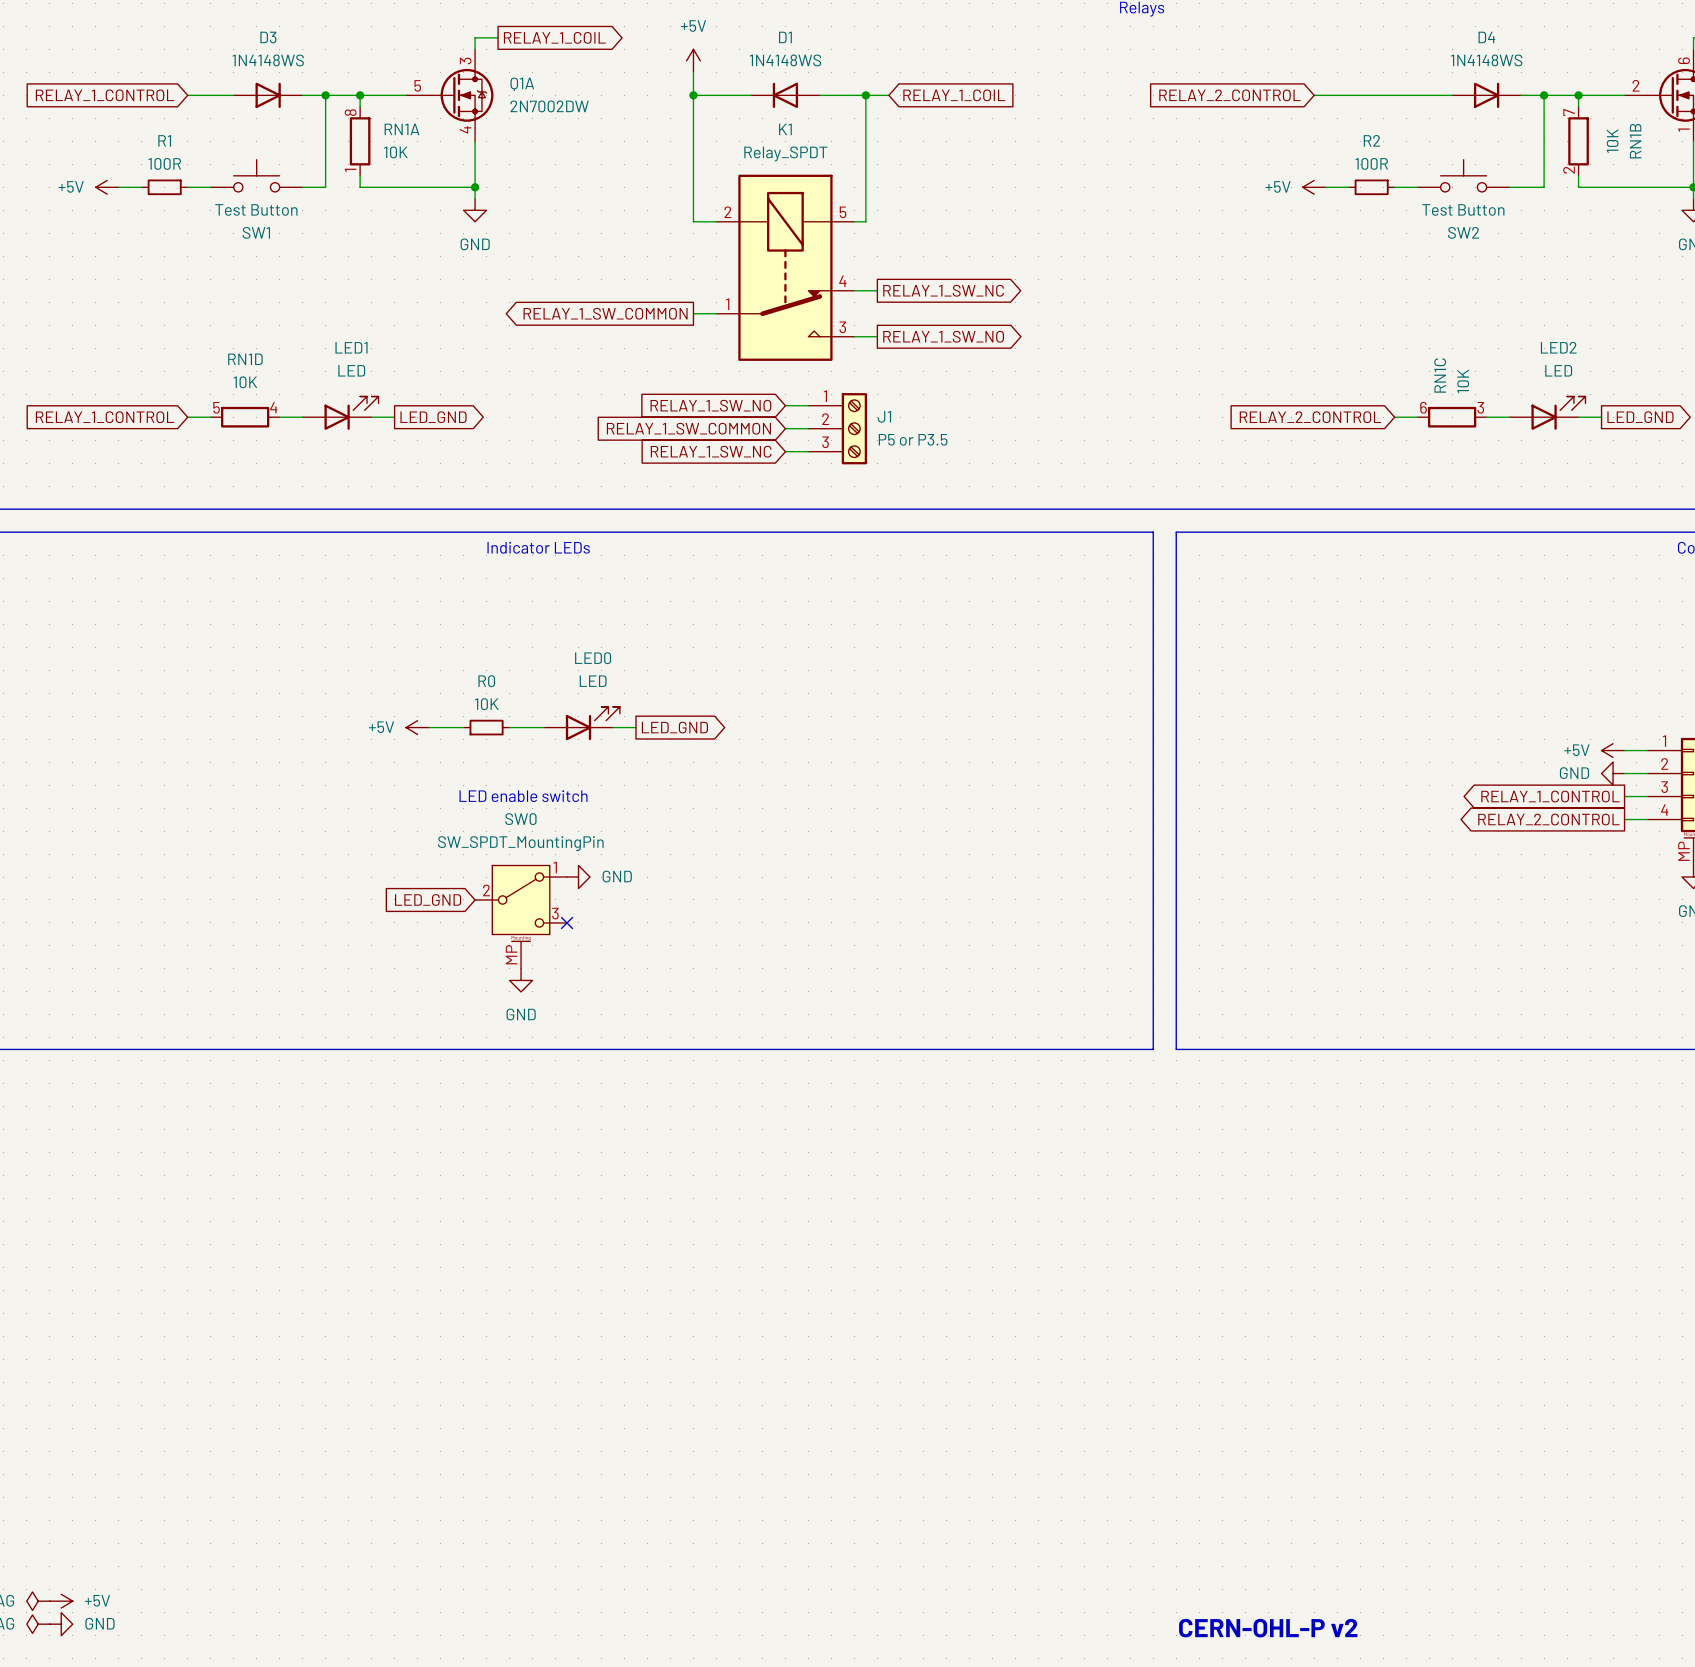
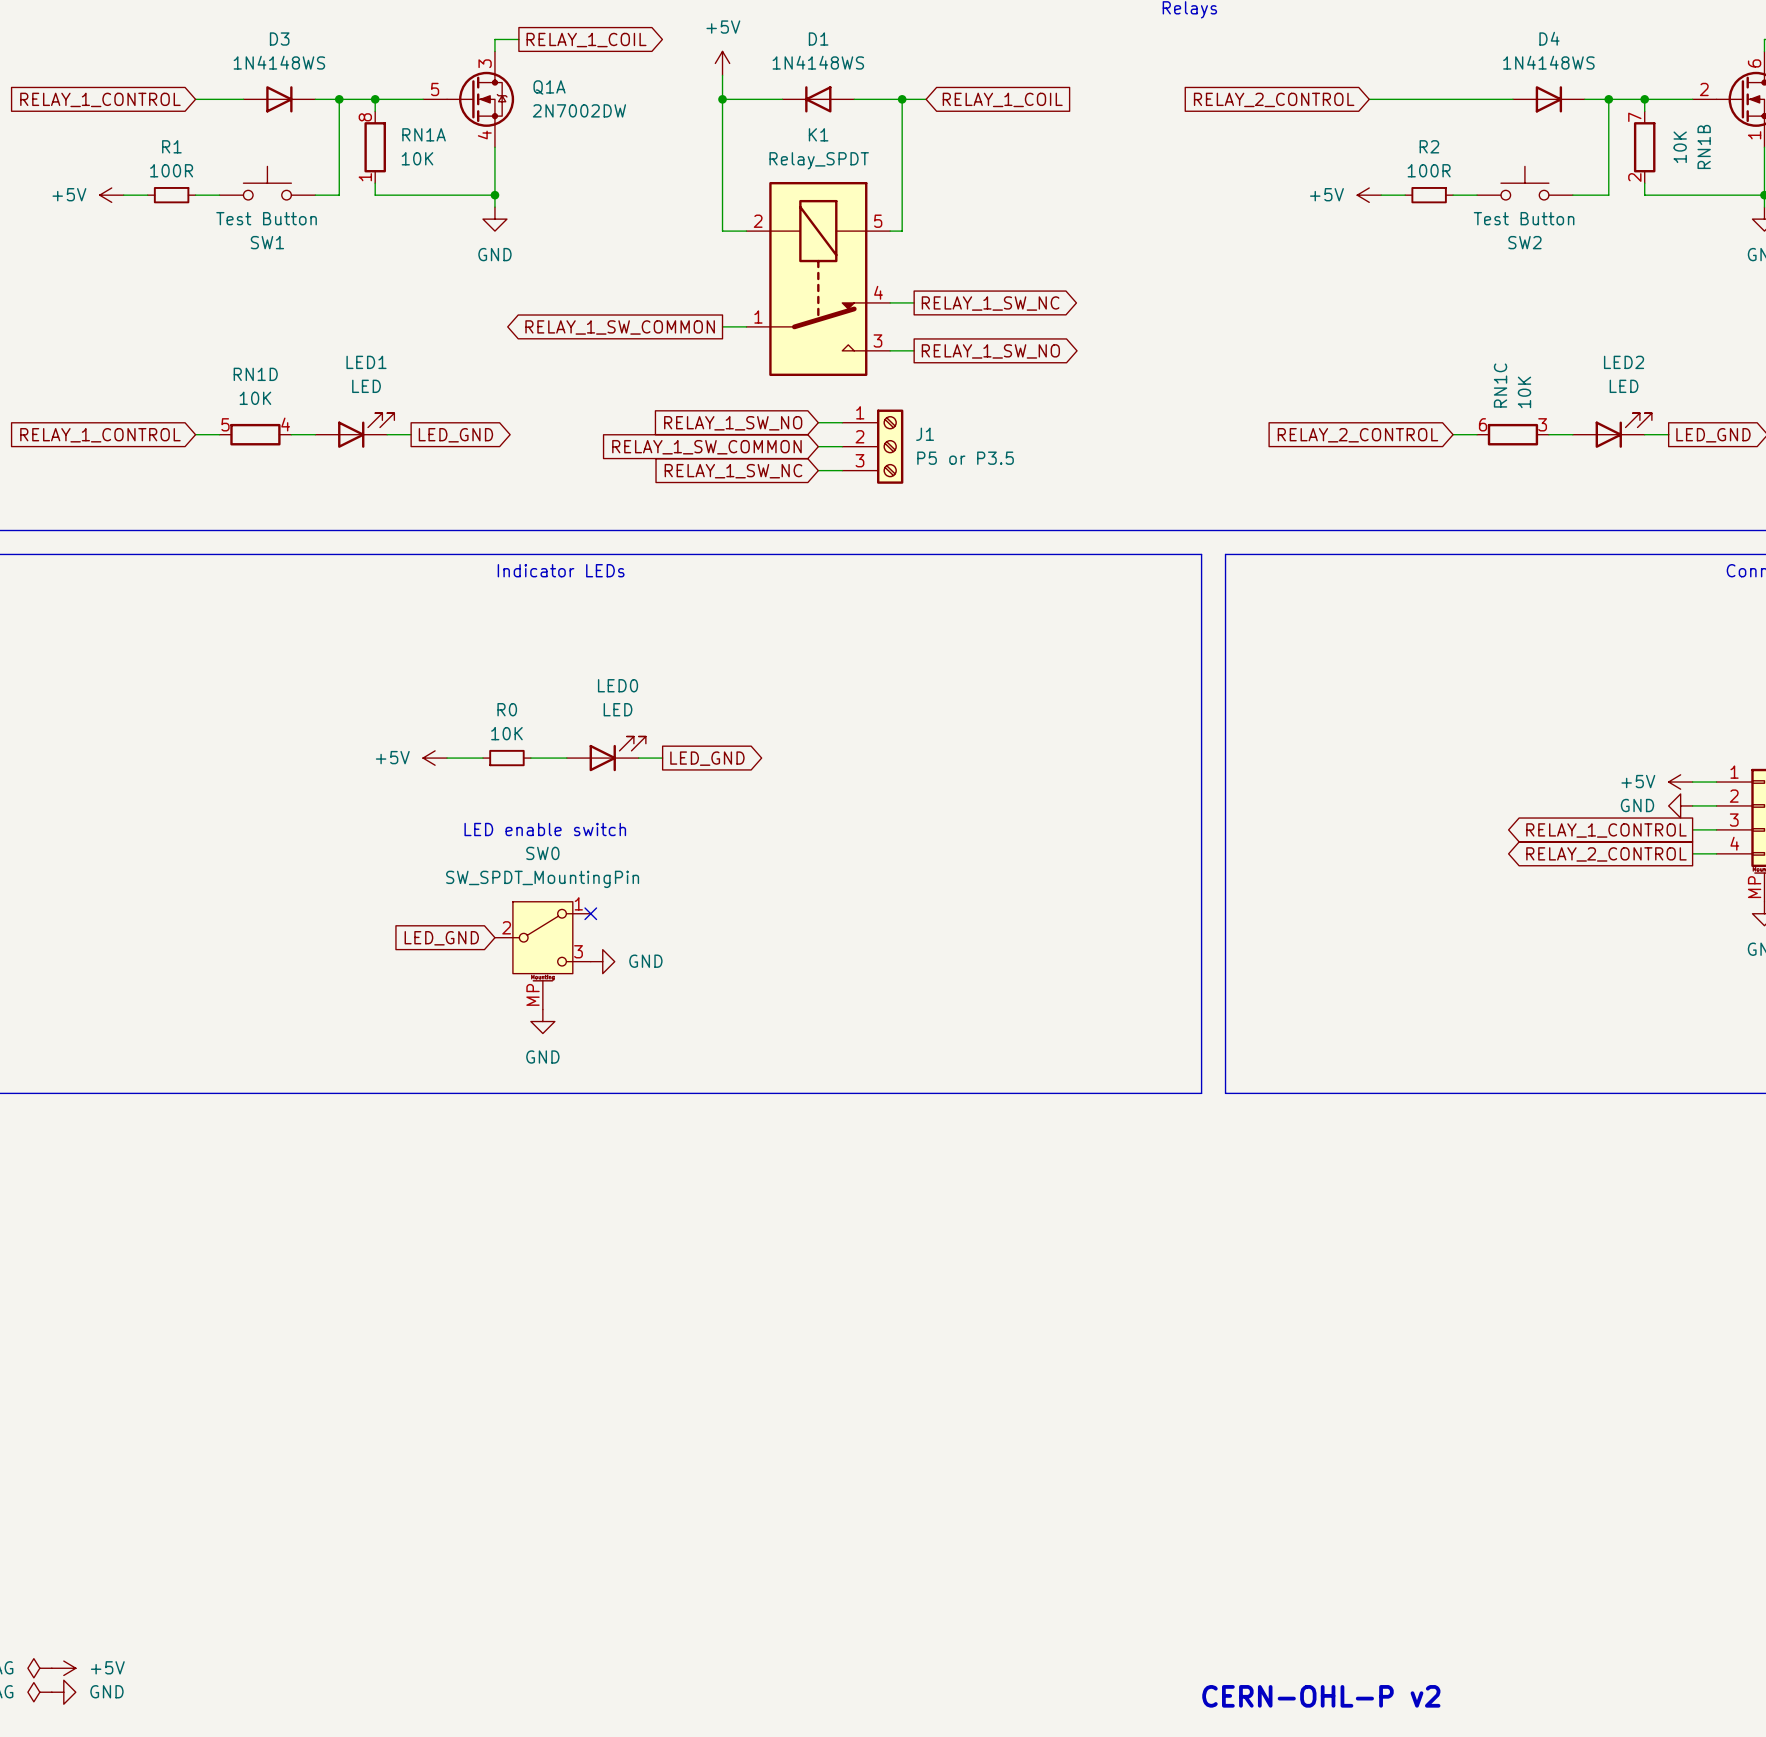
power symbol position: GND (578, 877) -> GND (602, 961)
no-connect mark position: (567, 922) -> (590, 913)

